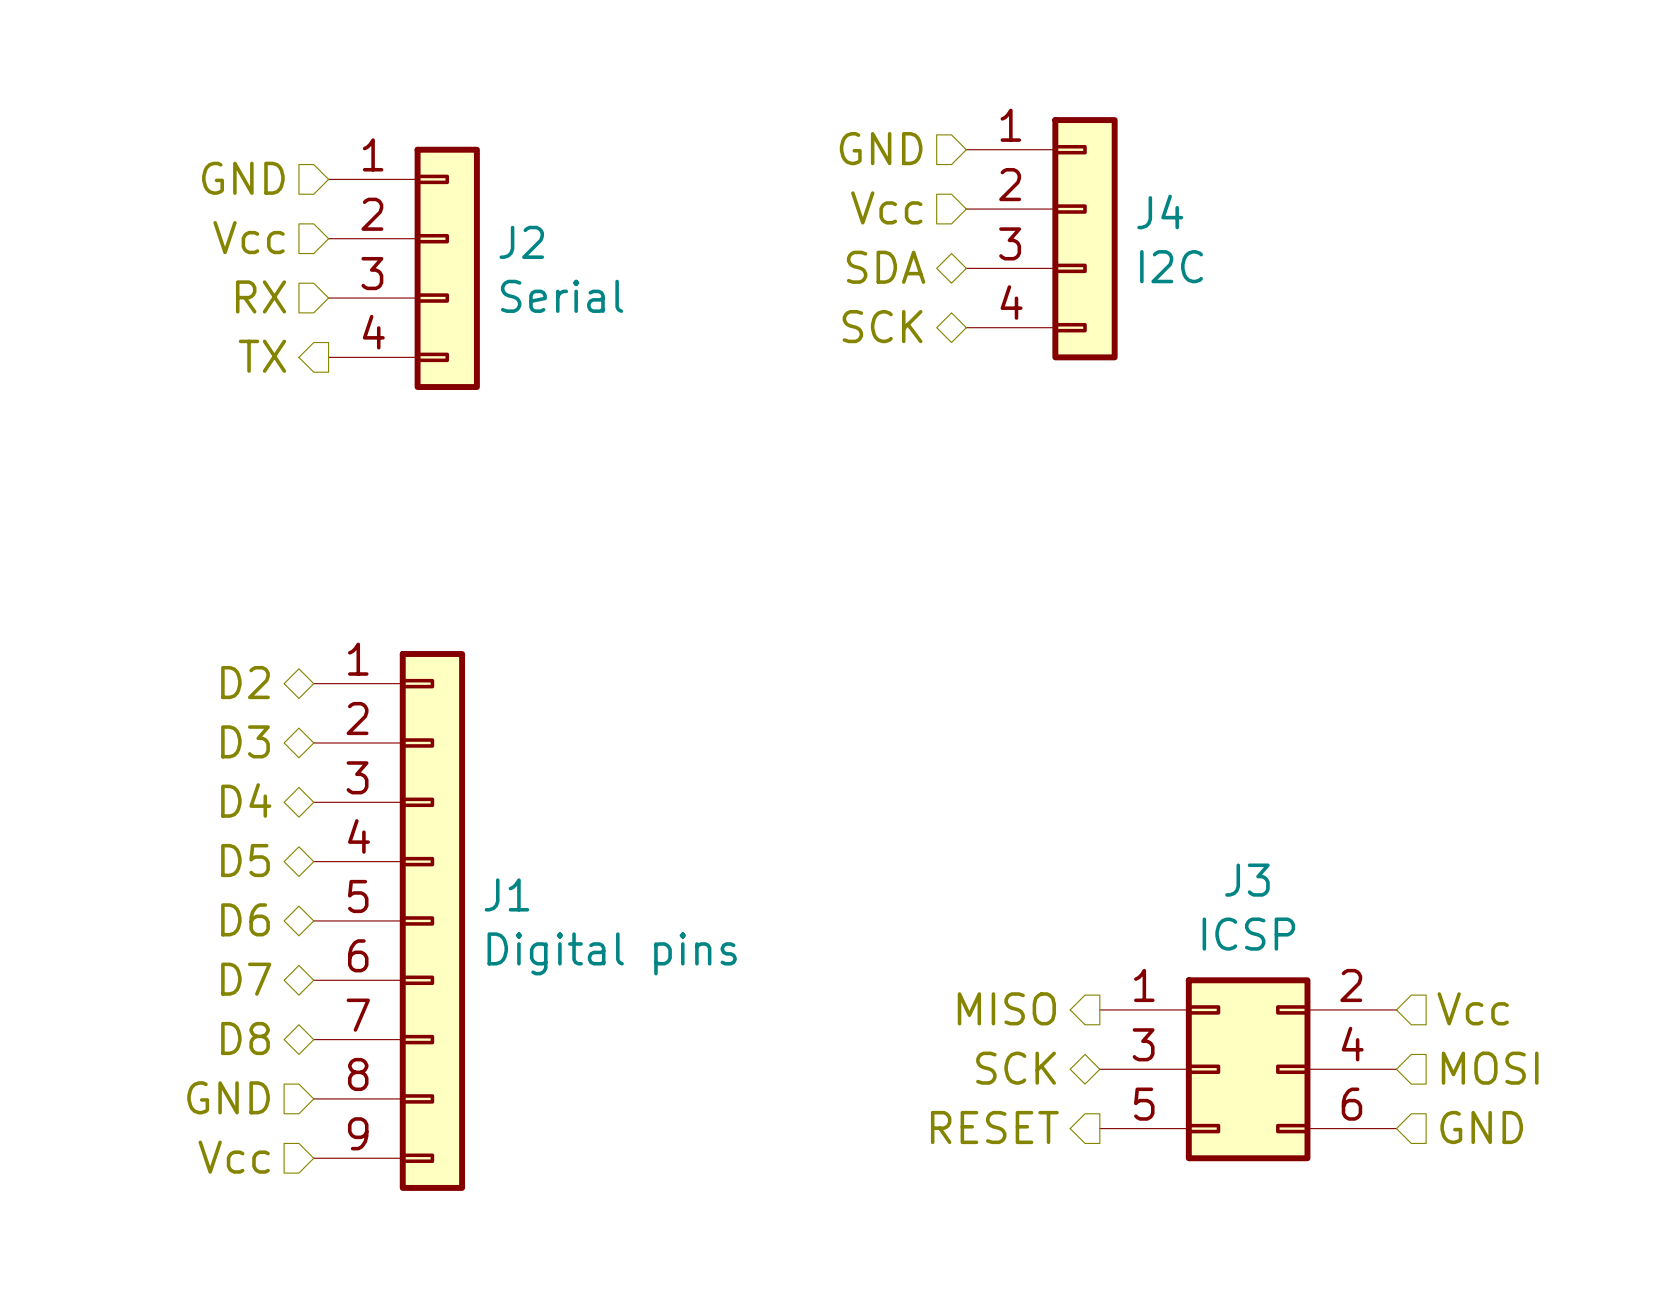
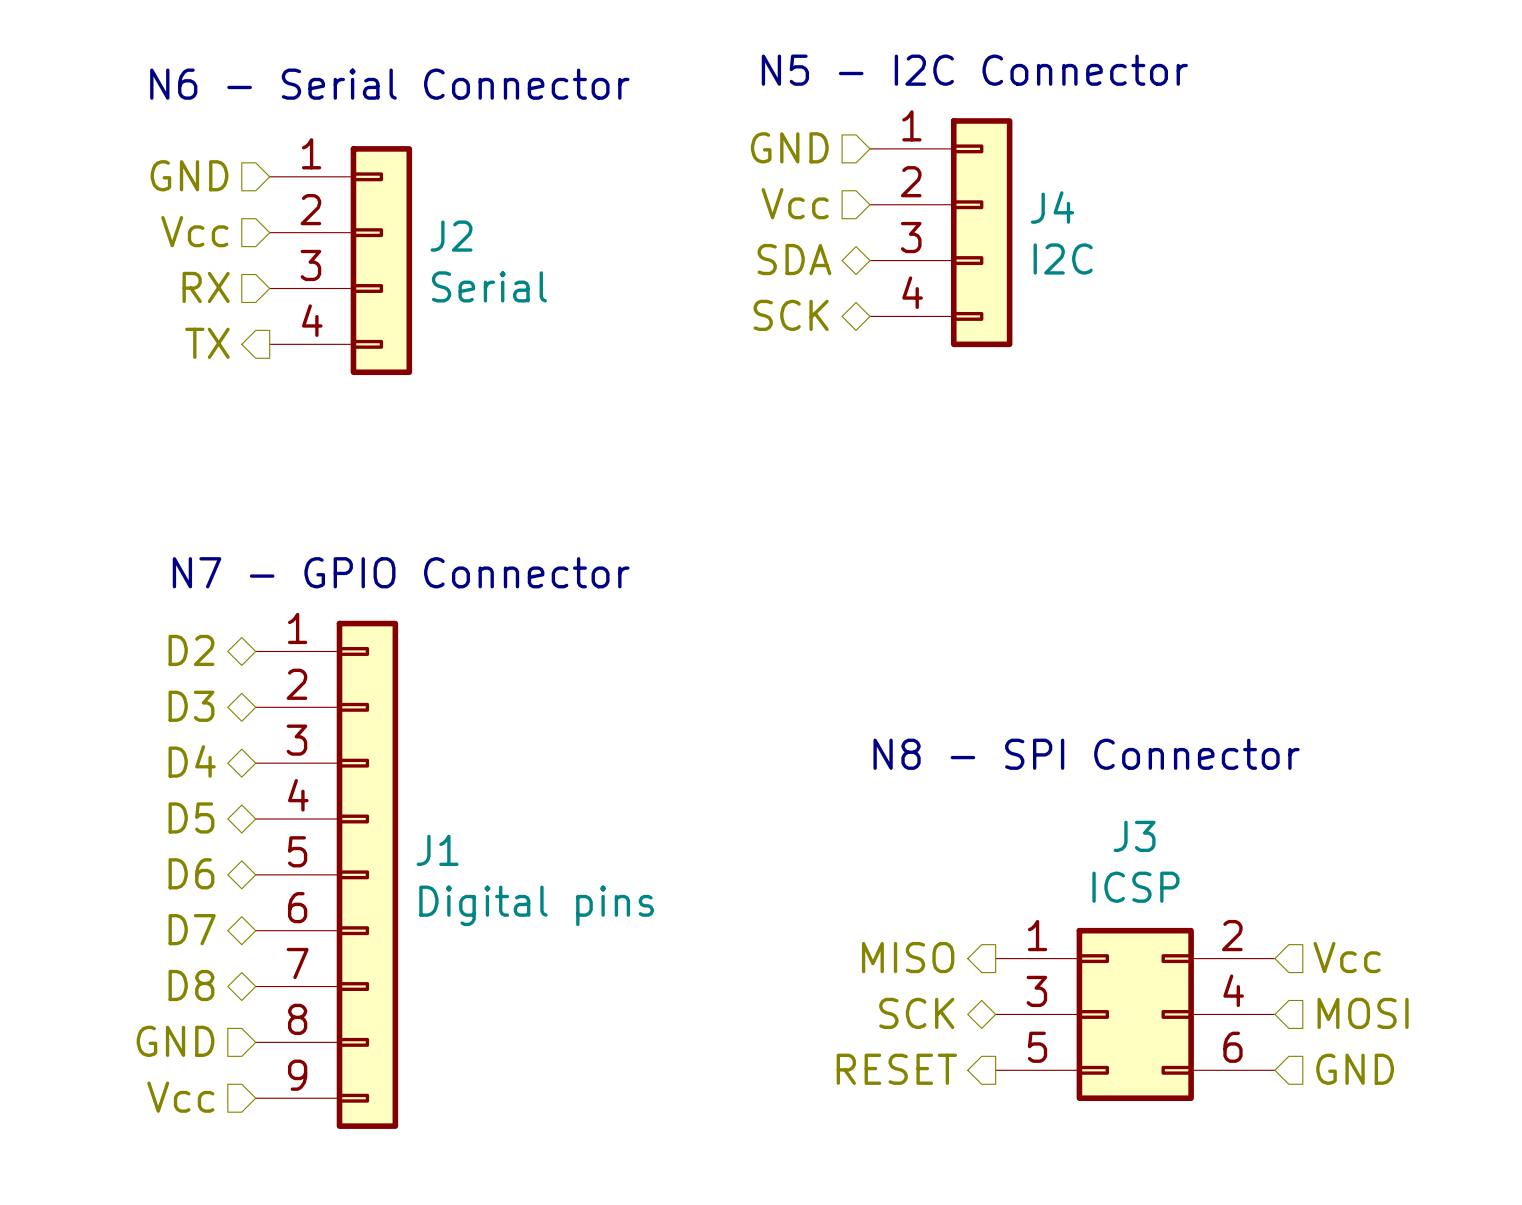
text: none -> N5 - I2C Connector (974, 70)
text: none -> N6 - Serial Connector (389, 84)
text: none -> N7 - GPIO Connector (401, 572)
text: none -> N8 - SPI Connector (1086, 754)

